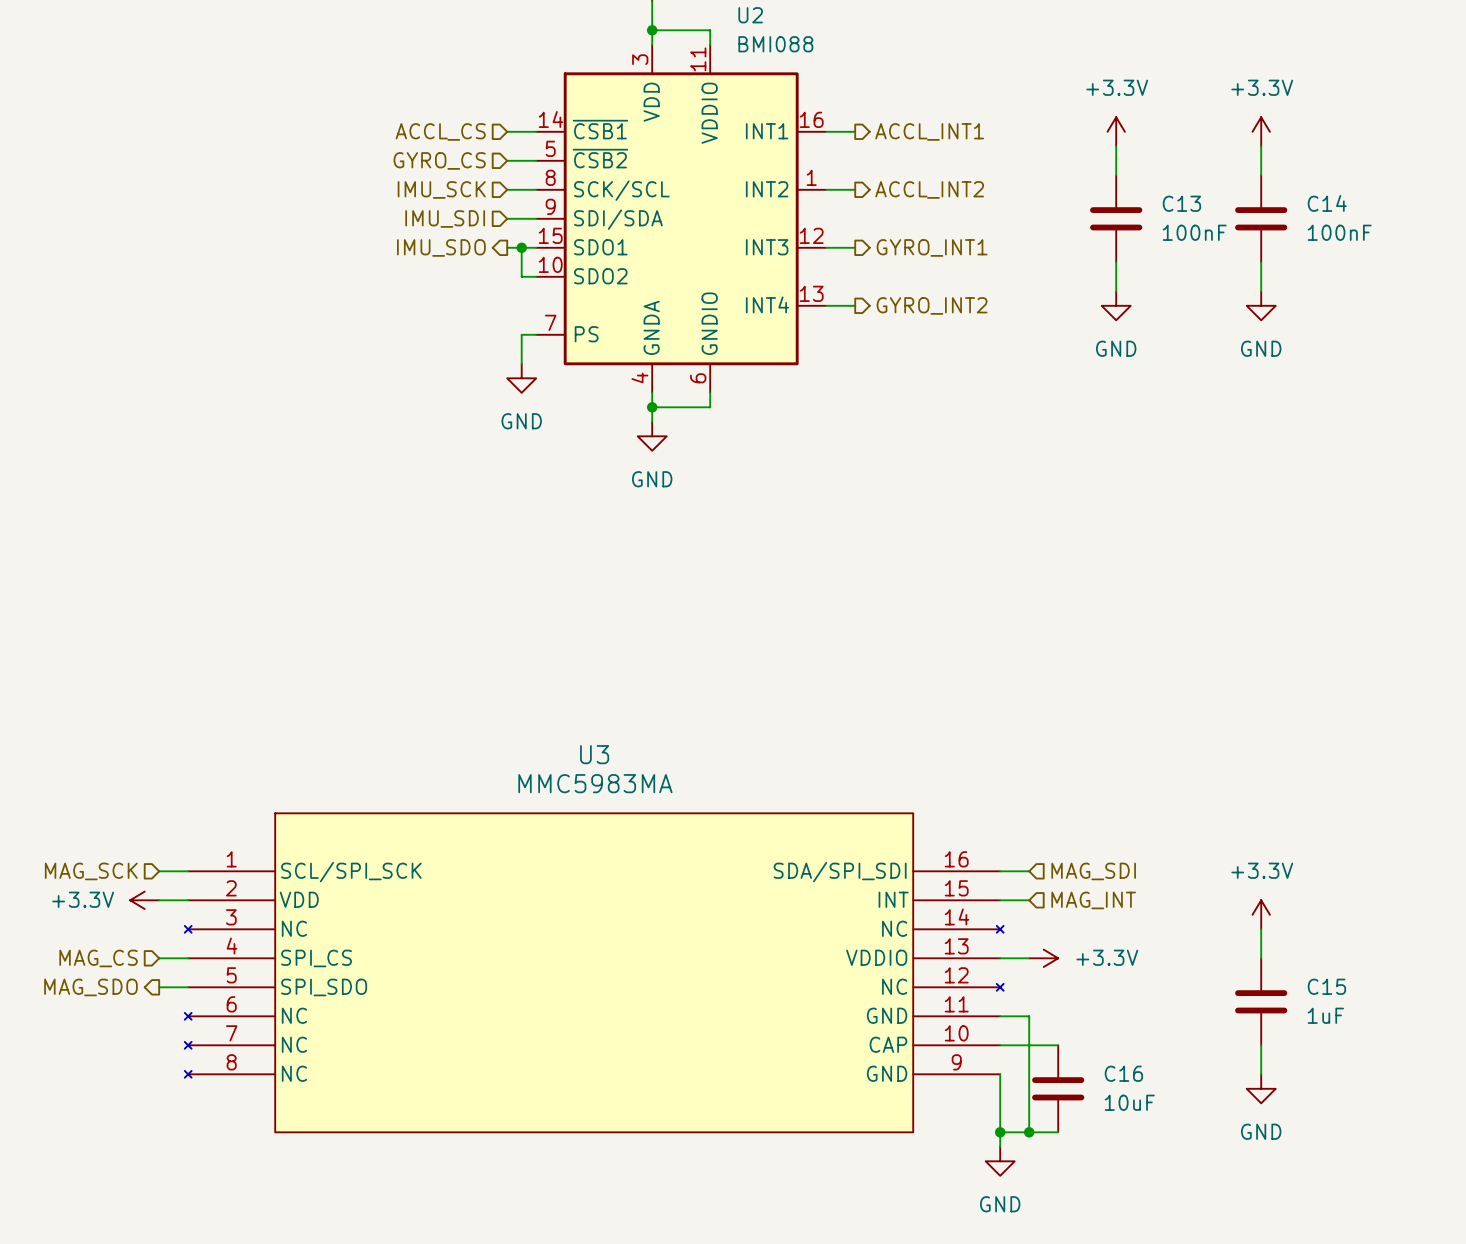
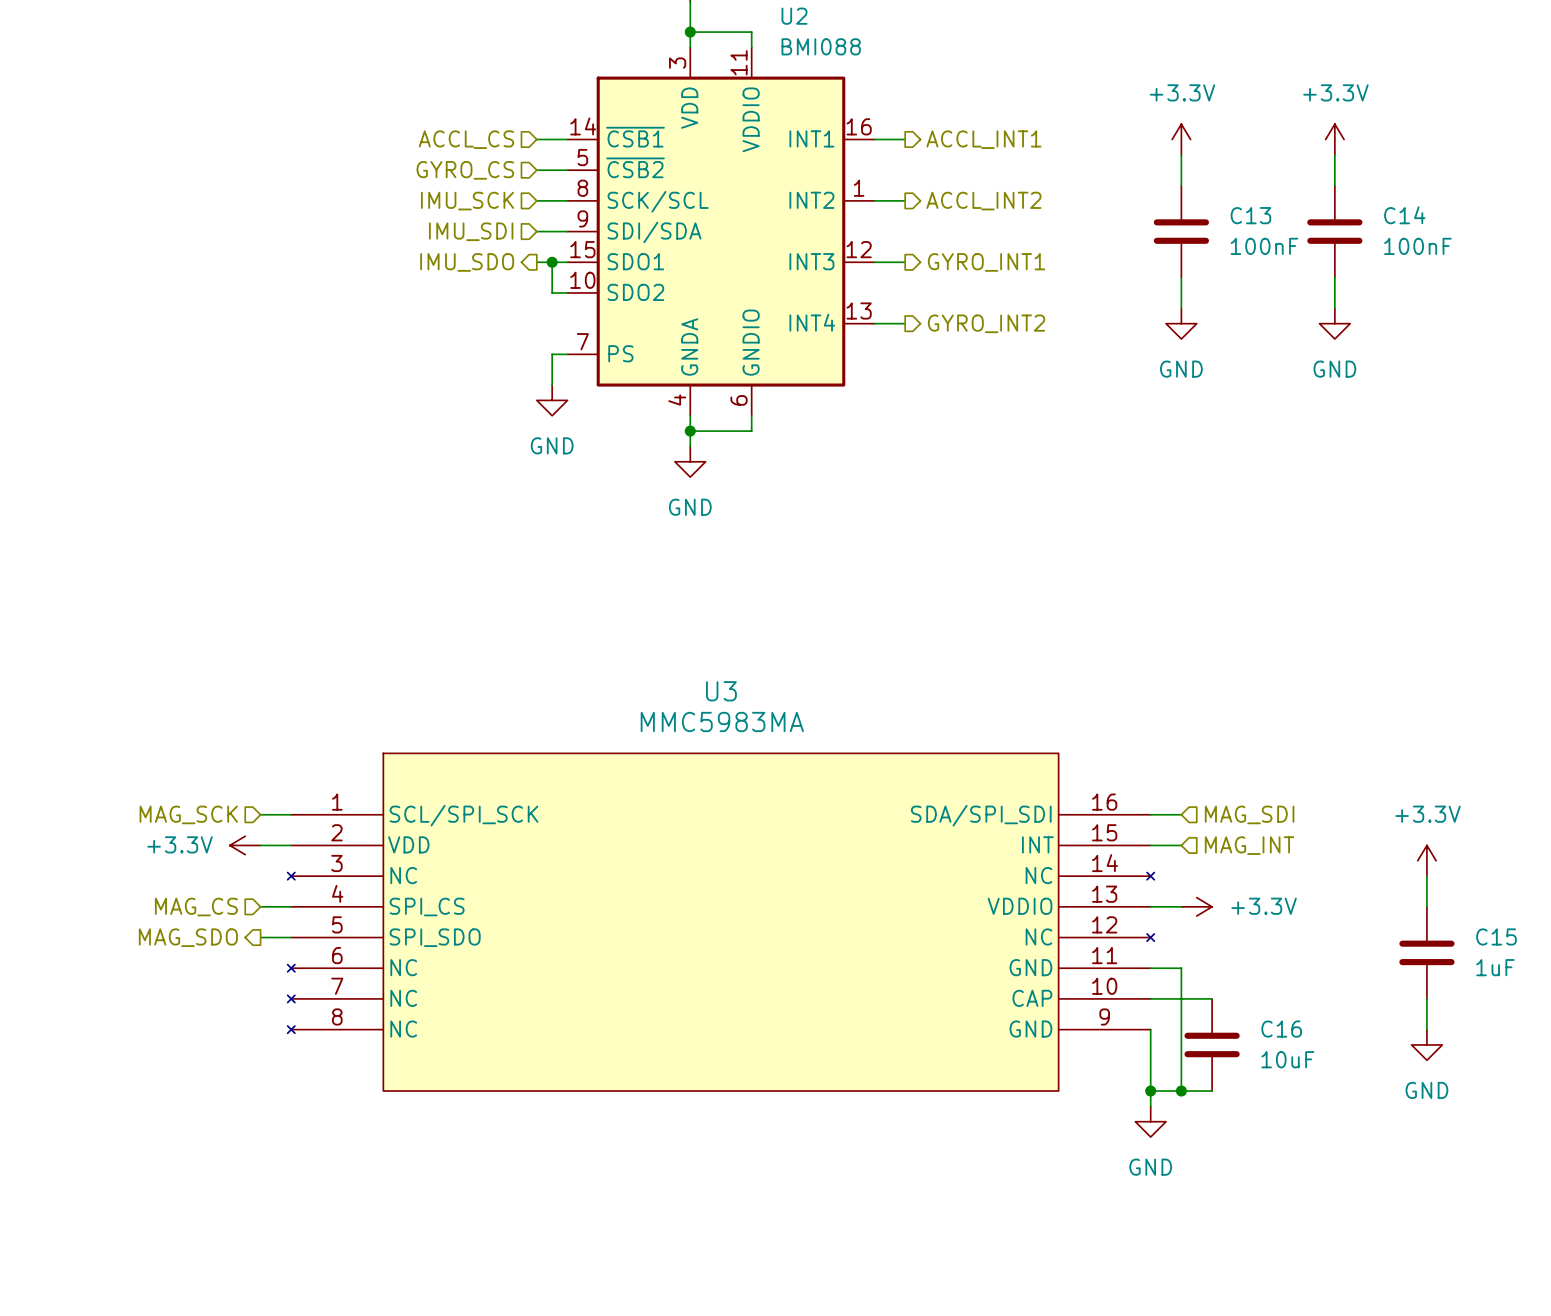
power symbol: none -> +3.3V (1426, 860)
power symbol: none -> +3.3V (1196, 906)
hierarchical label position: MAG_SCK (91, 871) -> MAG_SCK (188, 814)
wire: (159, 871) (188, 871) -> (260, 814) (291, 814)
wire: (1000, 871) (1029, 871) -> (1150, 814) (1181, 814)
hierarchical label position: MAG_SDI (1093, 871) -> MAG_SDI (1249, 814)
power symbol position: +3.3V (144, 900) -> +3.3V (245, 845)
wire: (159, 900) (188, 900) -> (260, 845) (291, 845)
wire: (1000, 900) (1029, 900) -> (1150, 845) (1181, 845)
hierarchical label position: MAG_INT (1093, 900) -> MAG_INT (1249, 845)
power symbol: +3.3V (1261, 914) -> none
wire: (1261, 929) (1261, 958) -> (1426, 876) (1426, 906)
hierarchical label position: MAG_CS (98, 958) -> MAG_CS (196, 907)
wire: (159, 958) (188, 958) -> (260, 906) (291, 906)
wire: (1000, 958) (1029, 958) -> (1150, 906) (1181, 906)
power symbol: +3.3V (1043, 958) -> none
U3 position: (594, 972) -> (720, 922)
hierarchical label position: MAG_SDO (90, 987) -> MAG_SDO (188, 937)
wire: (159, 987) (188, 987) -> (260, 937) (291, 937)
power symbol: none -> GND (1426, 1044)
C15 position: (1261, 1001) -> (1426, 952)
wire: (1000, 1016) (1029, 1016) (1029, 1132) -> (1150, 968) (1181, 968) (1181, 1091)
junction: none -> (1150, 1091)
junction: none -> (1181, 1091)
wire: (1000, 1045) (1058, 1045) -> (1150, 998) (1212, 998)
wire: (1261, 1045) (1261, 1074) -> (1426, 998) (1426, 1029)
power symbol: none -> GND (1150, 1121)
wire: (1000, 1074) (1000, 1146) -> (1150, 1029) (1150, 1106)
C16 position: (1058, 1088) -> (1212, 1044)
power symbol: GND (1261, 1088) -> none
wire: (1000, 1132) (1058, 1132) -> (1150, 1091) (1212, 1091)
junction: (1000, 1132) -> none
junction: (1029, 1132) -> none
power symbol: GND (1000, 1161) -> none

